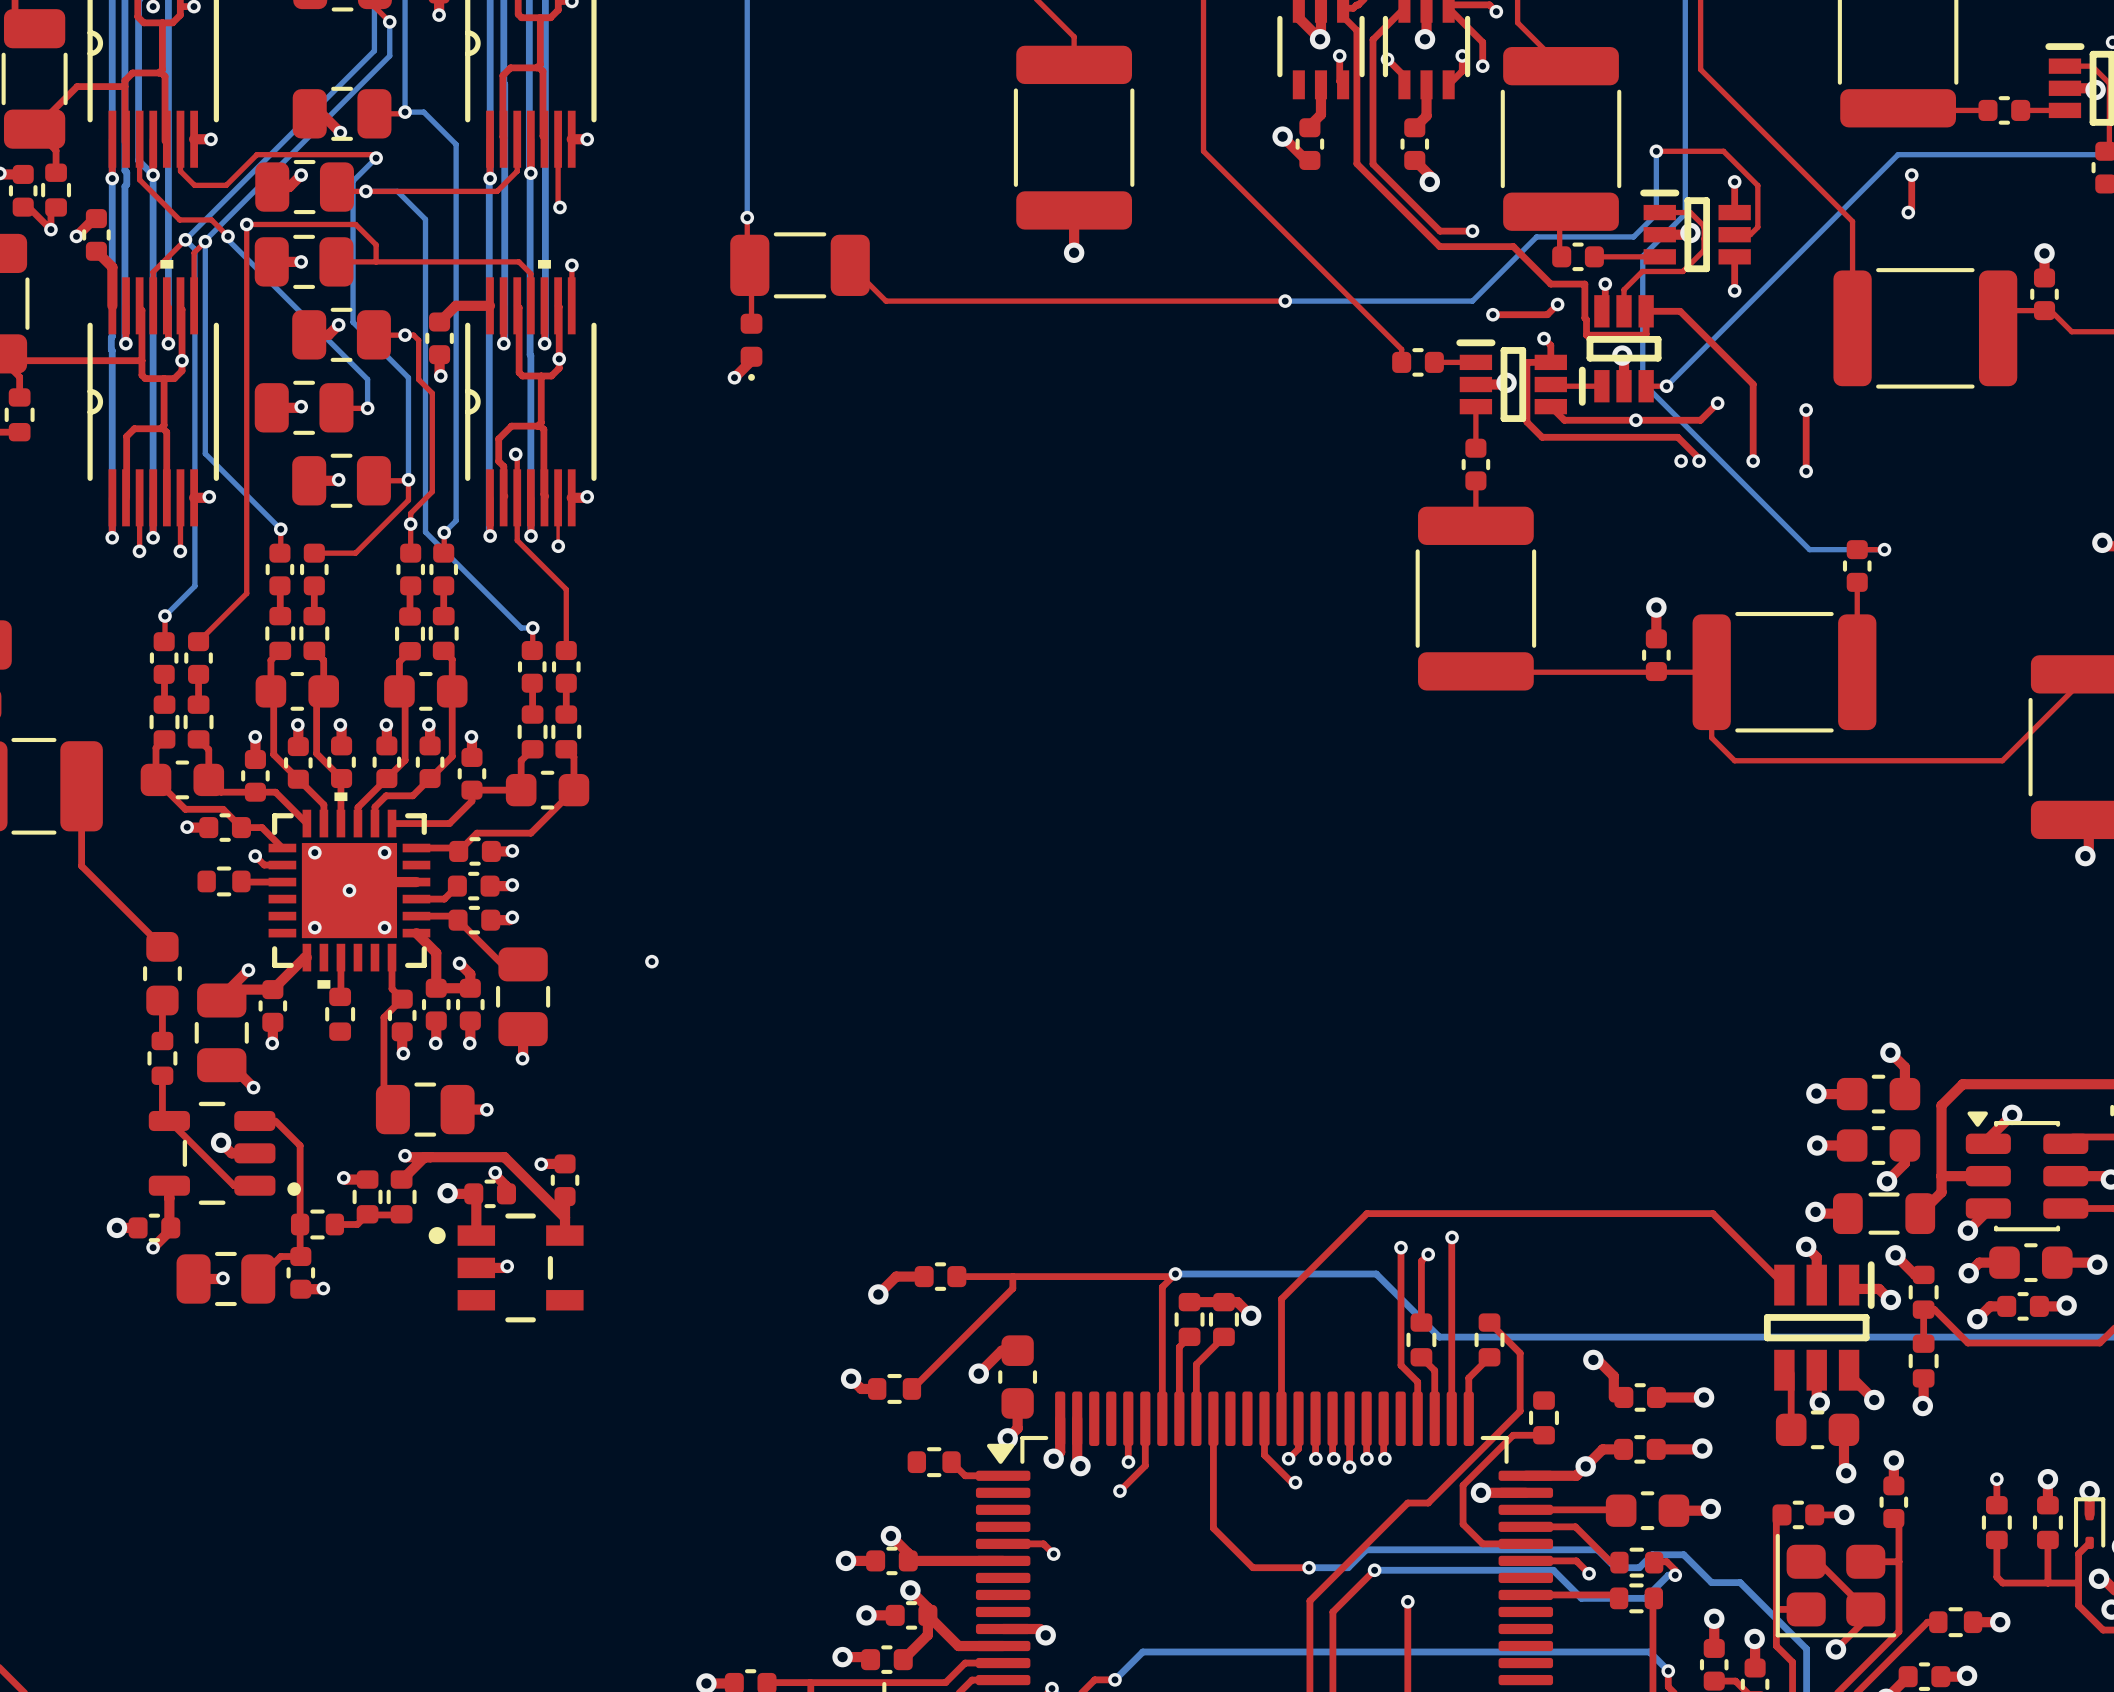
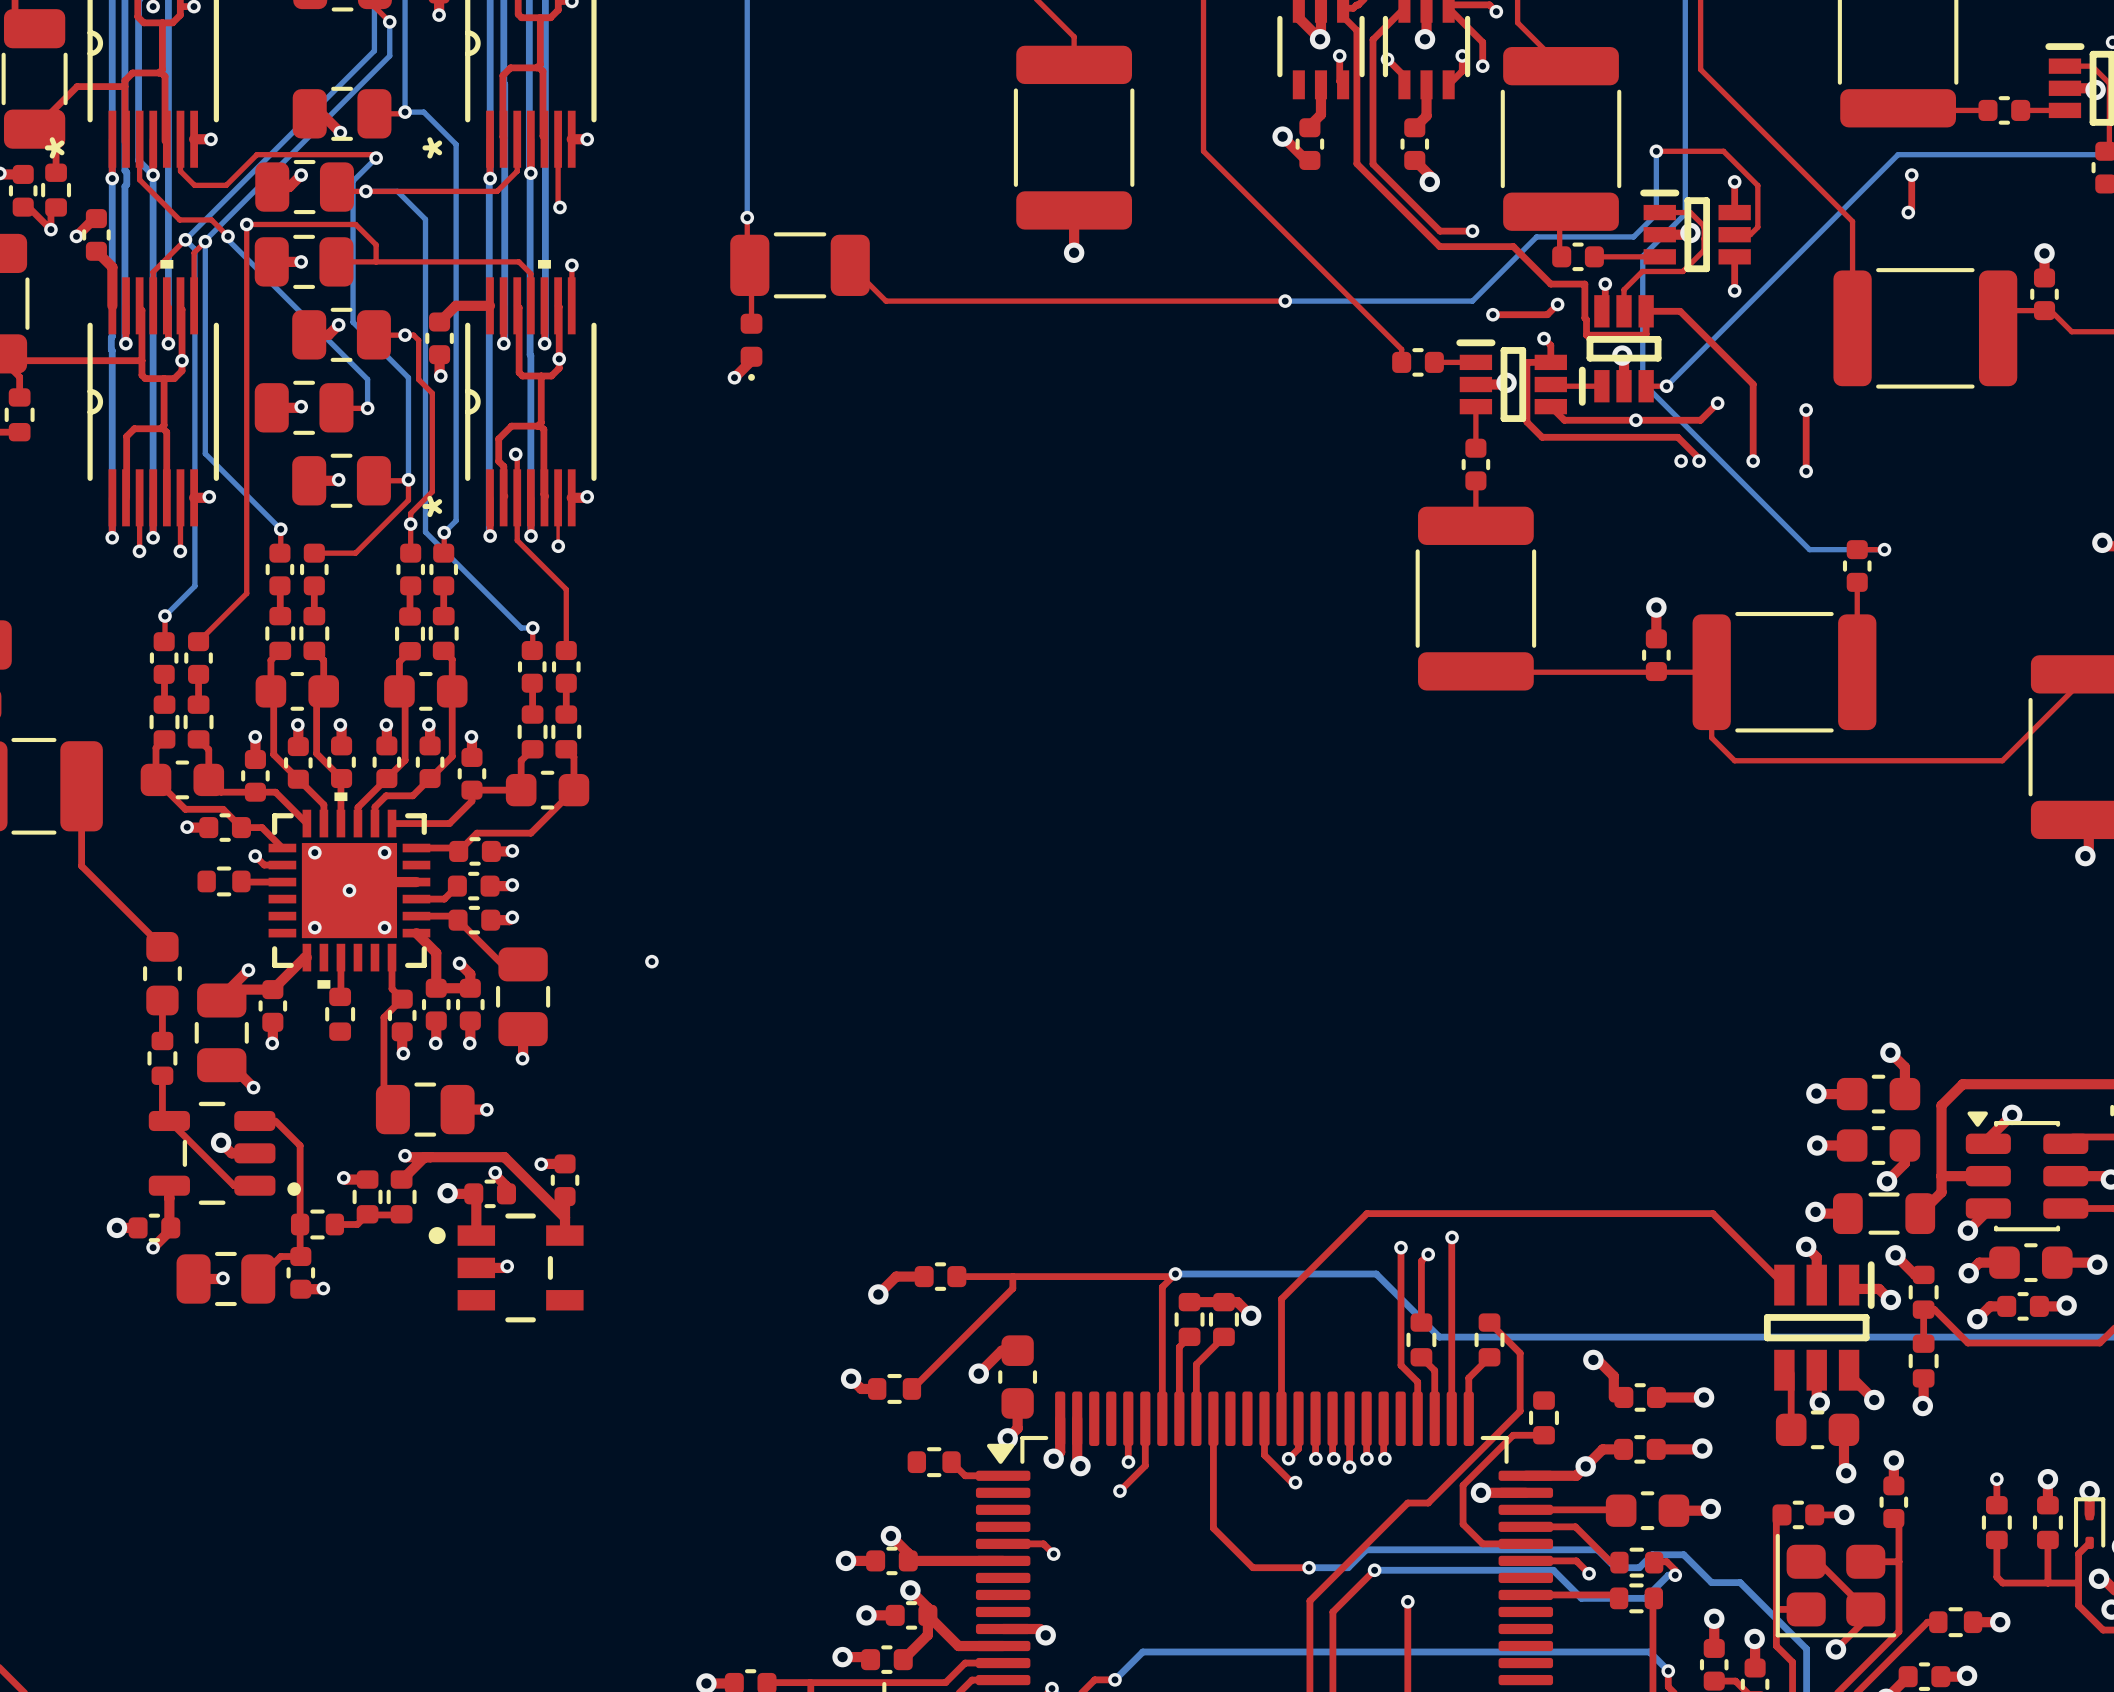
part text: none -> * (54, 147)
part text: none -> * (432, 147)
part text: none -> * (432, 506)

